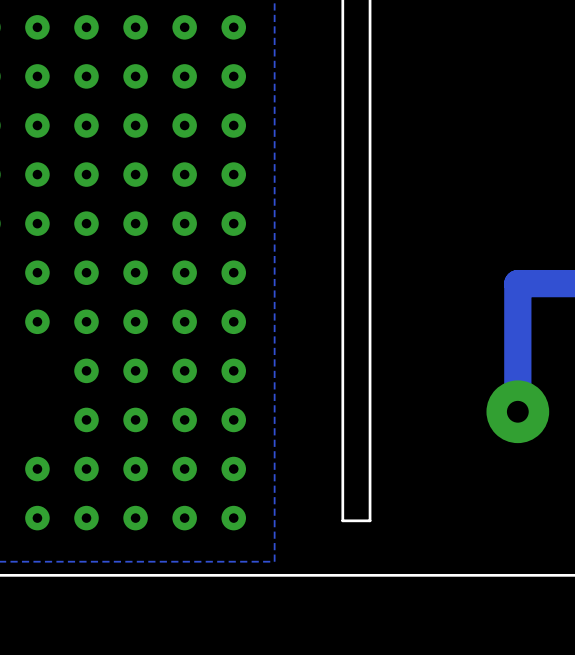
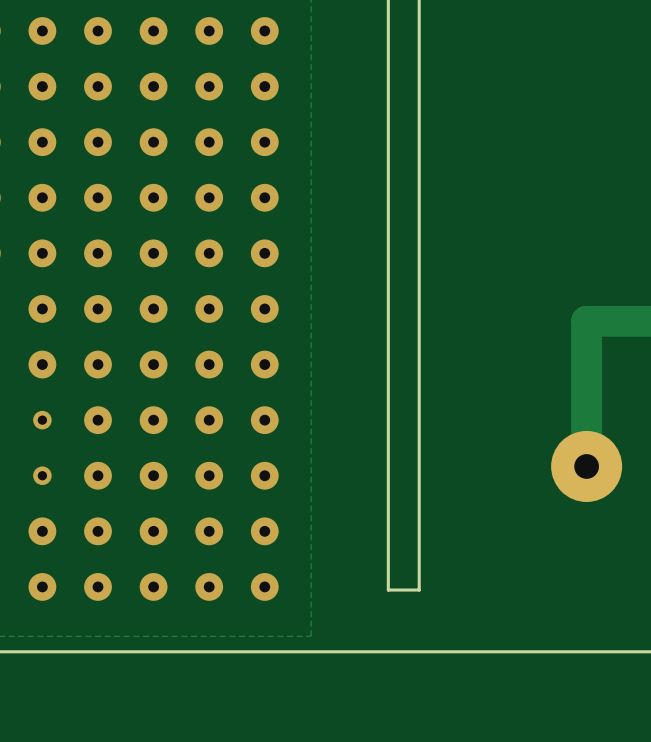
via: none -> (42, 420)
via: none -> (42, 475)

